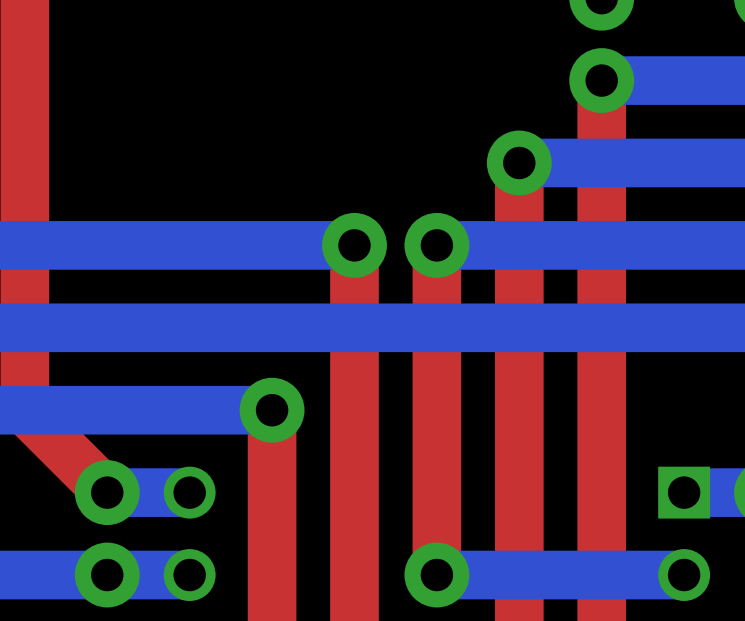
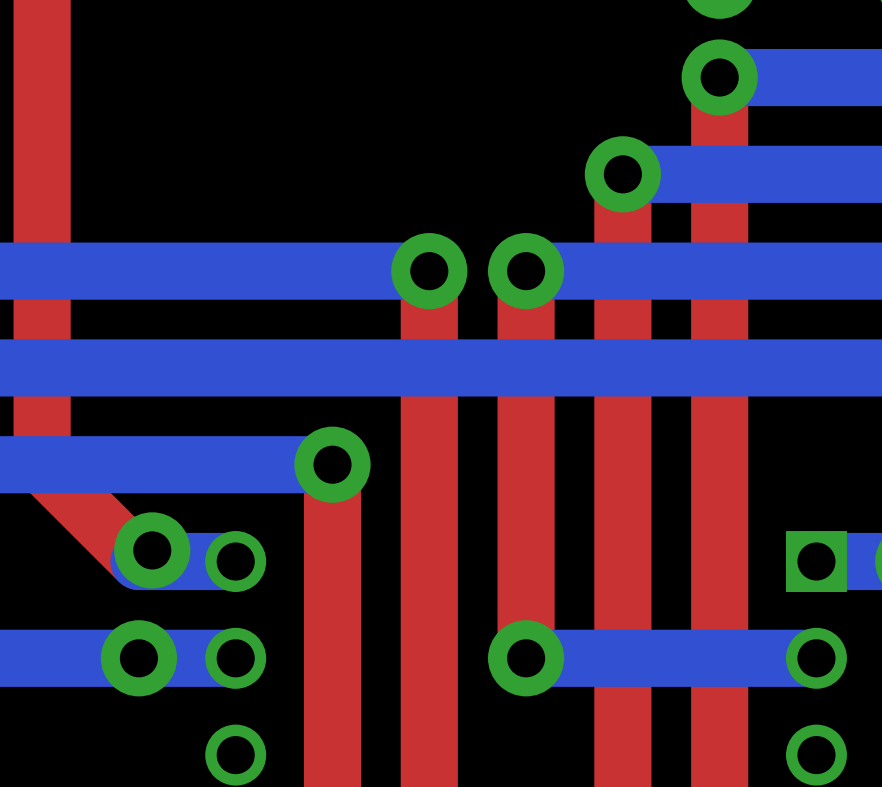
via position: (107, 492) -> (152, 550)

